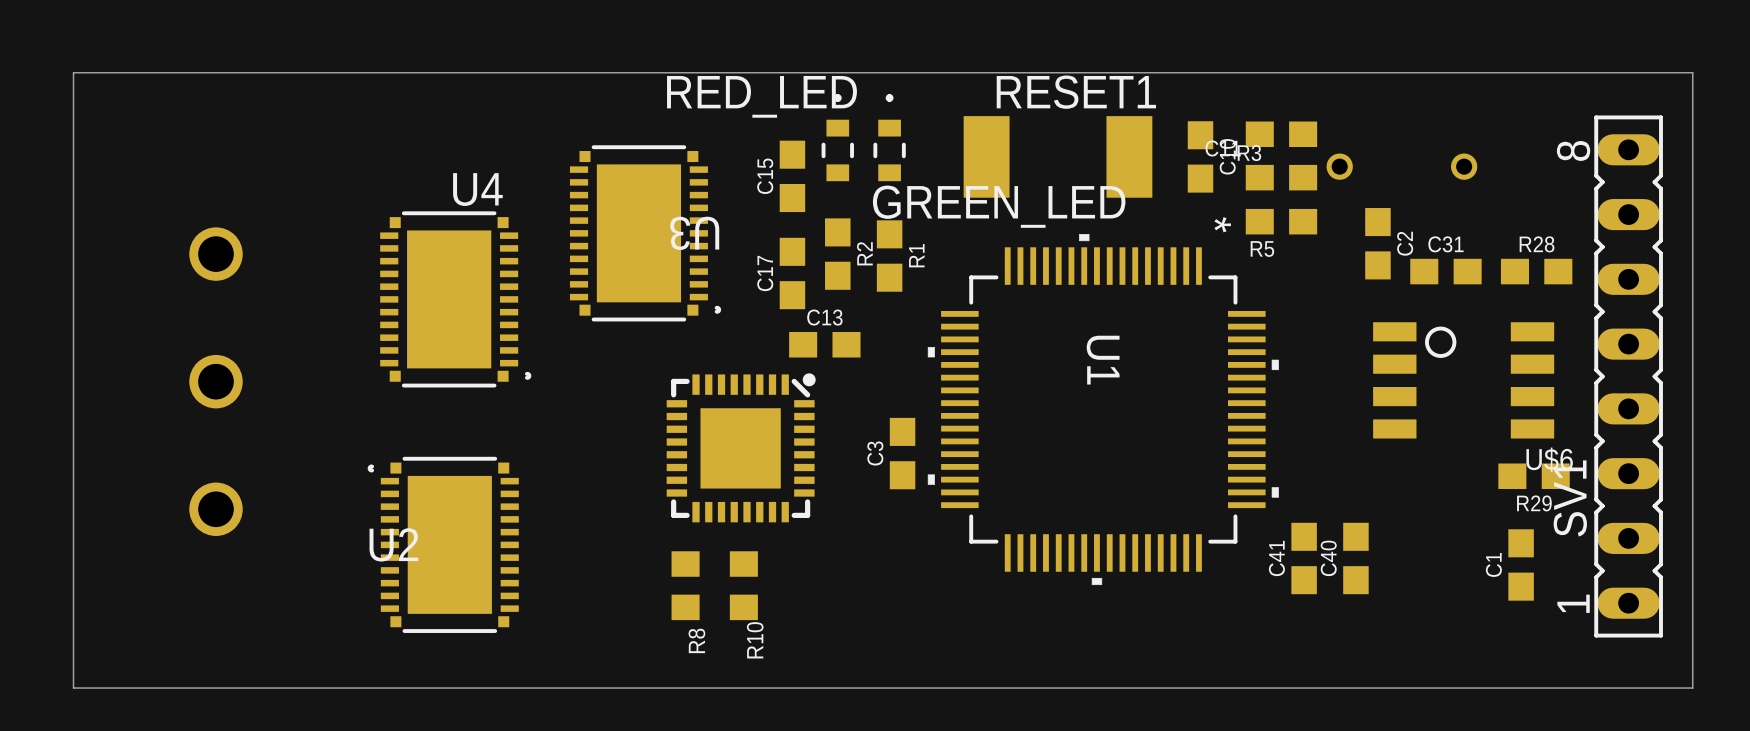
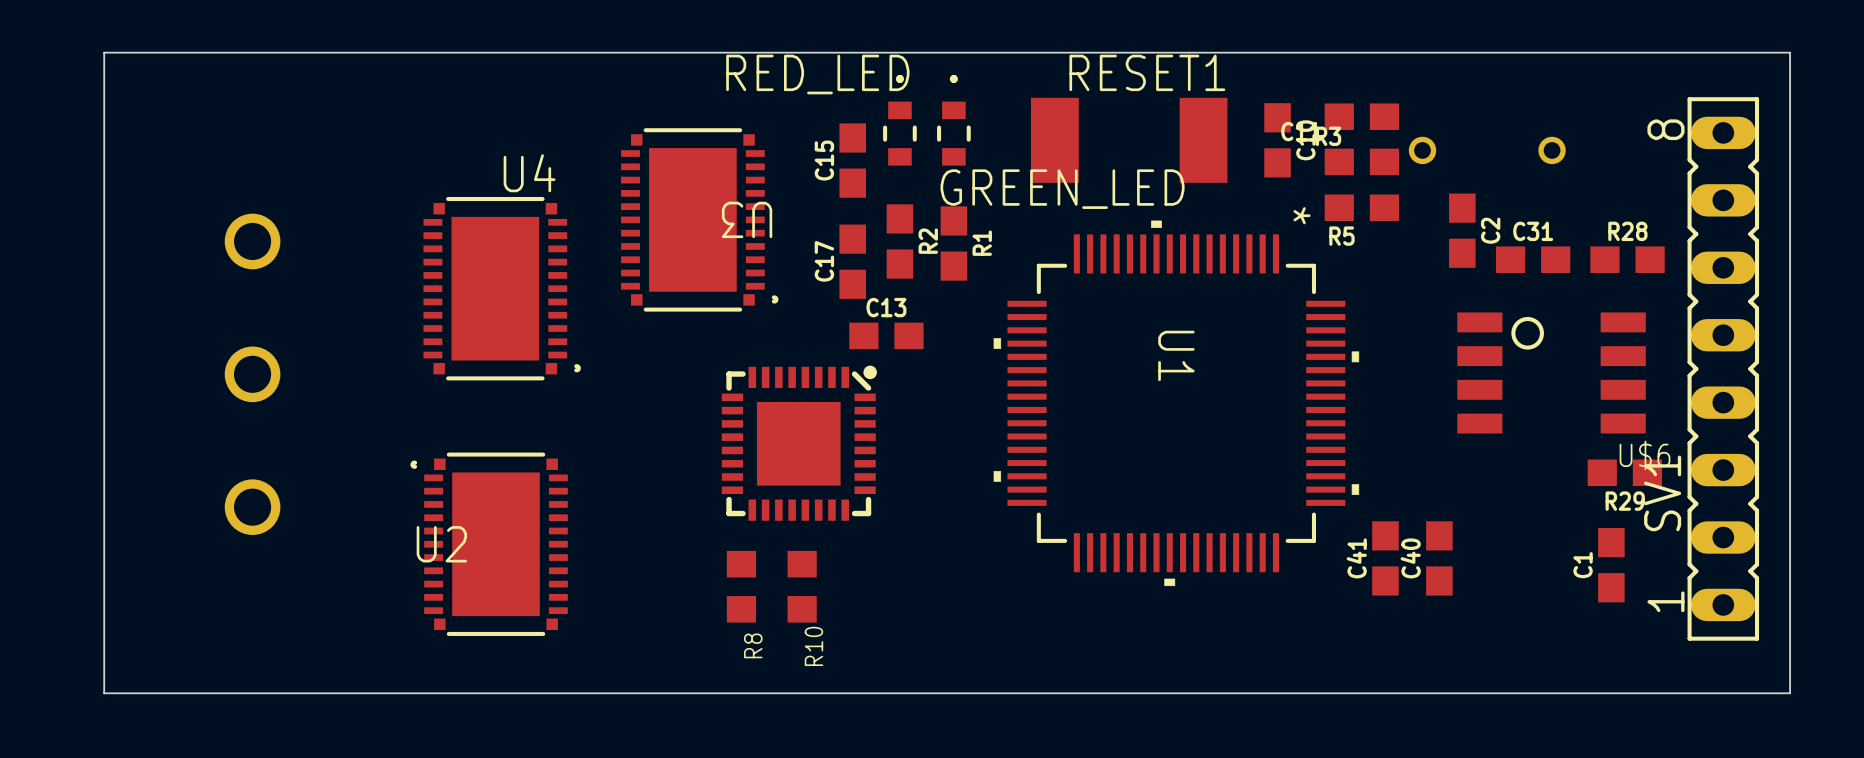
C3: (902, 453) -> none

